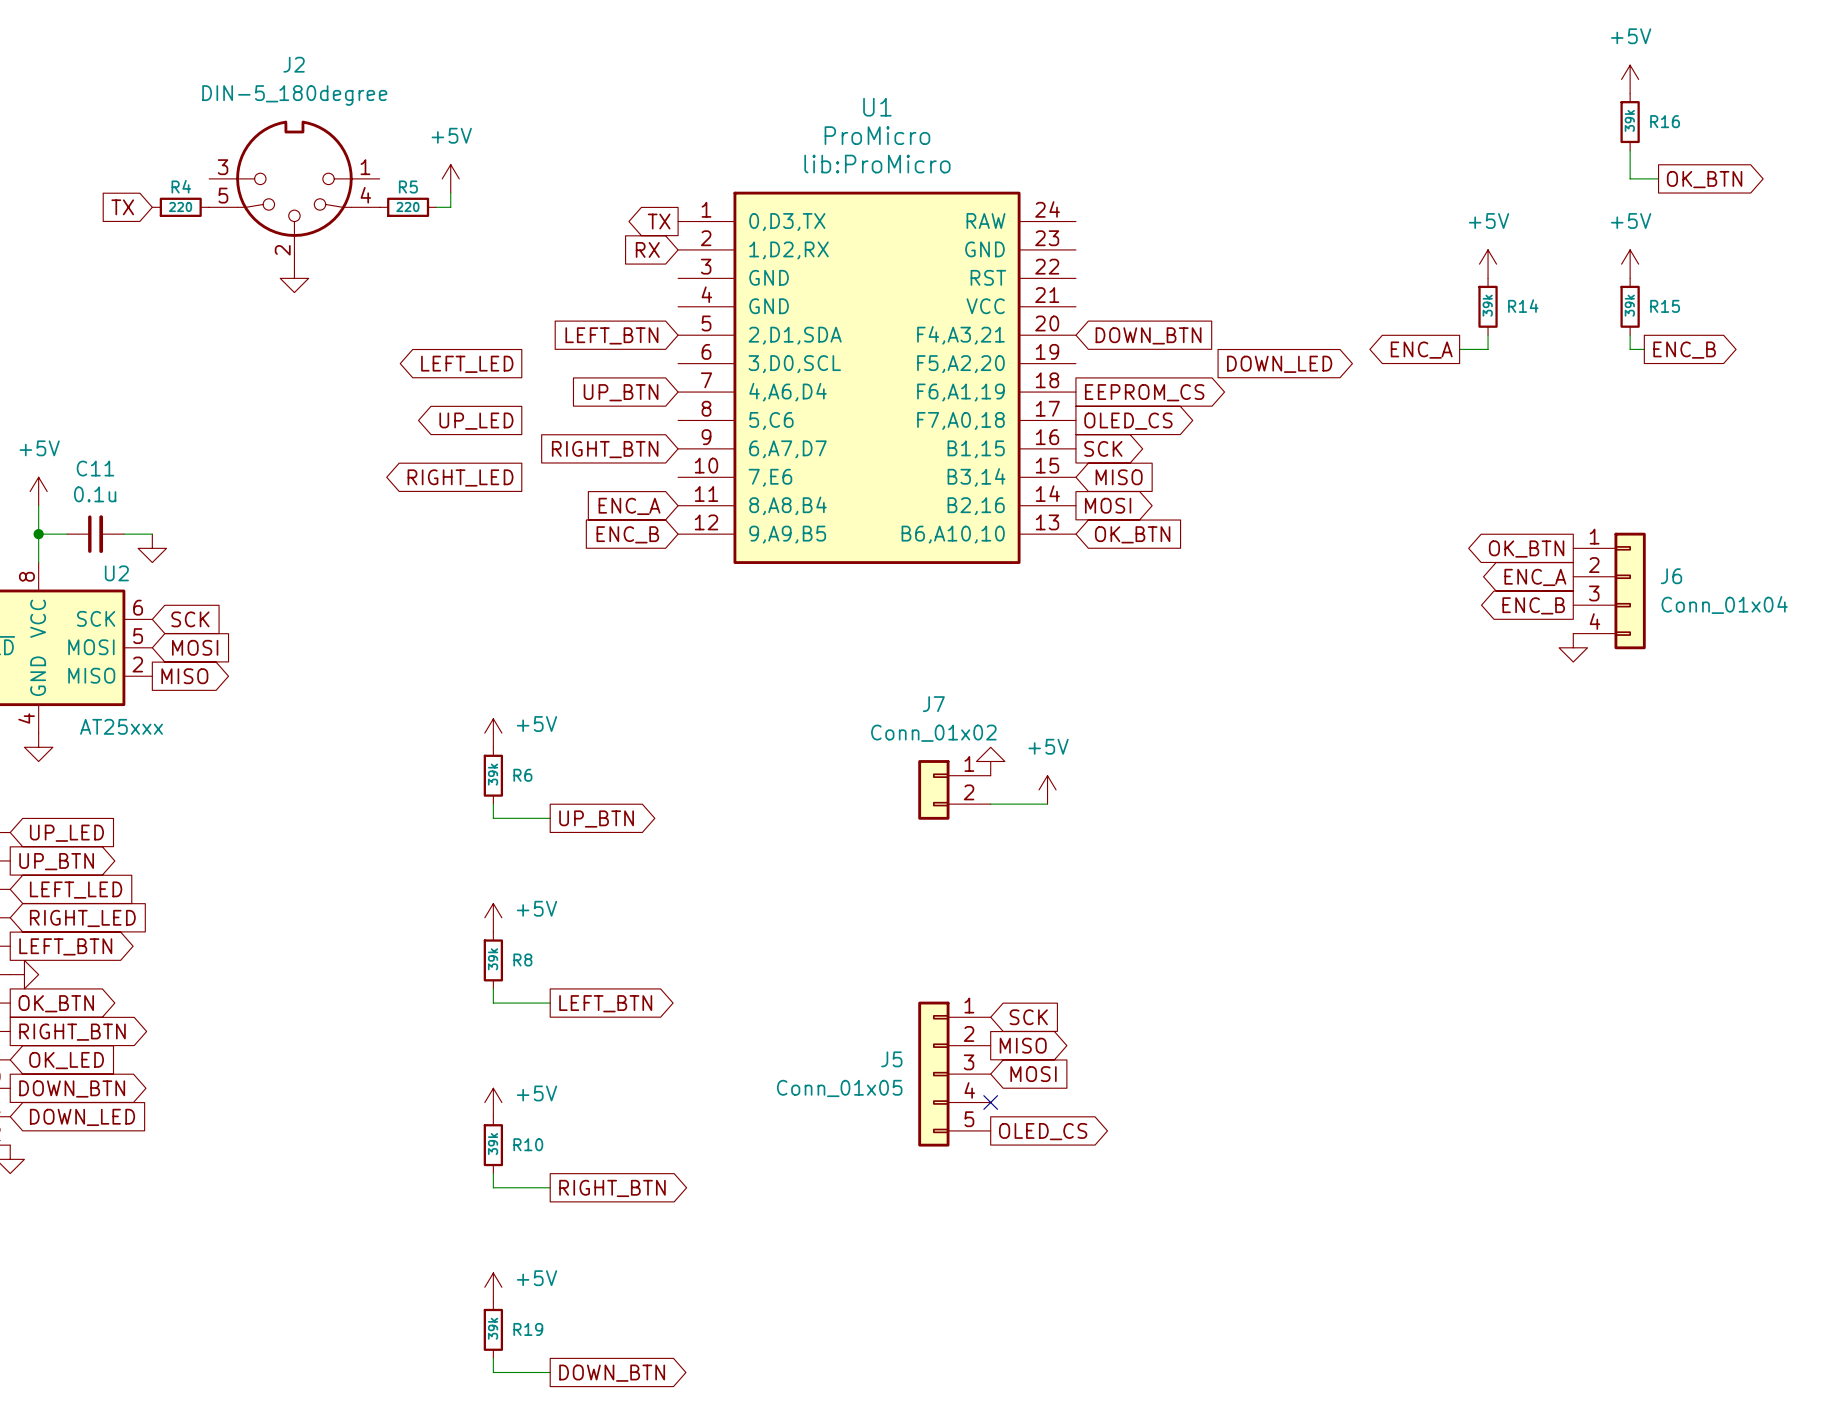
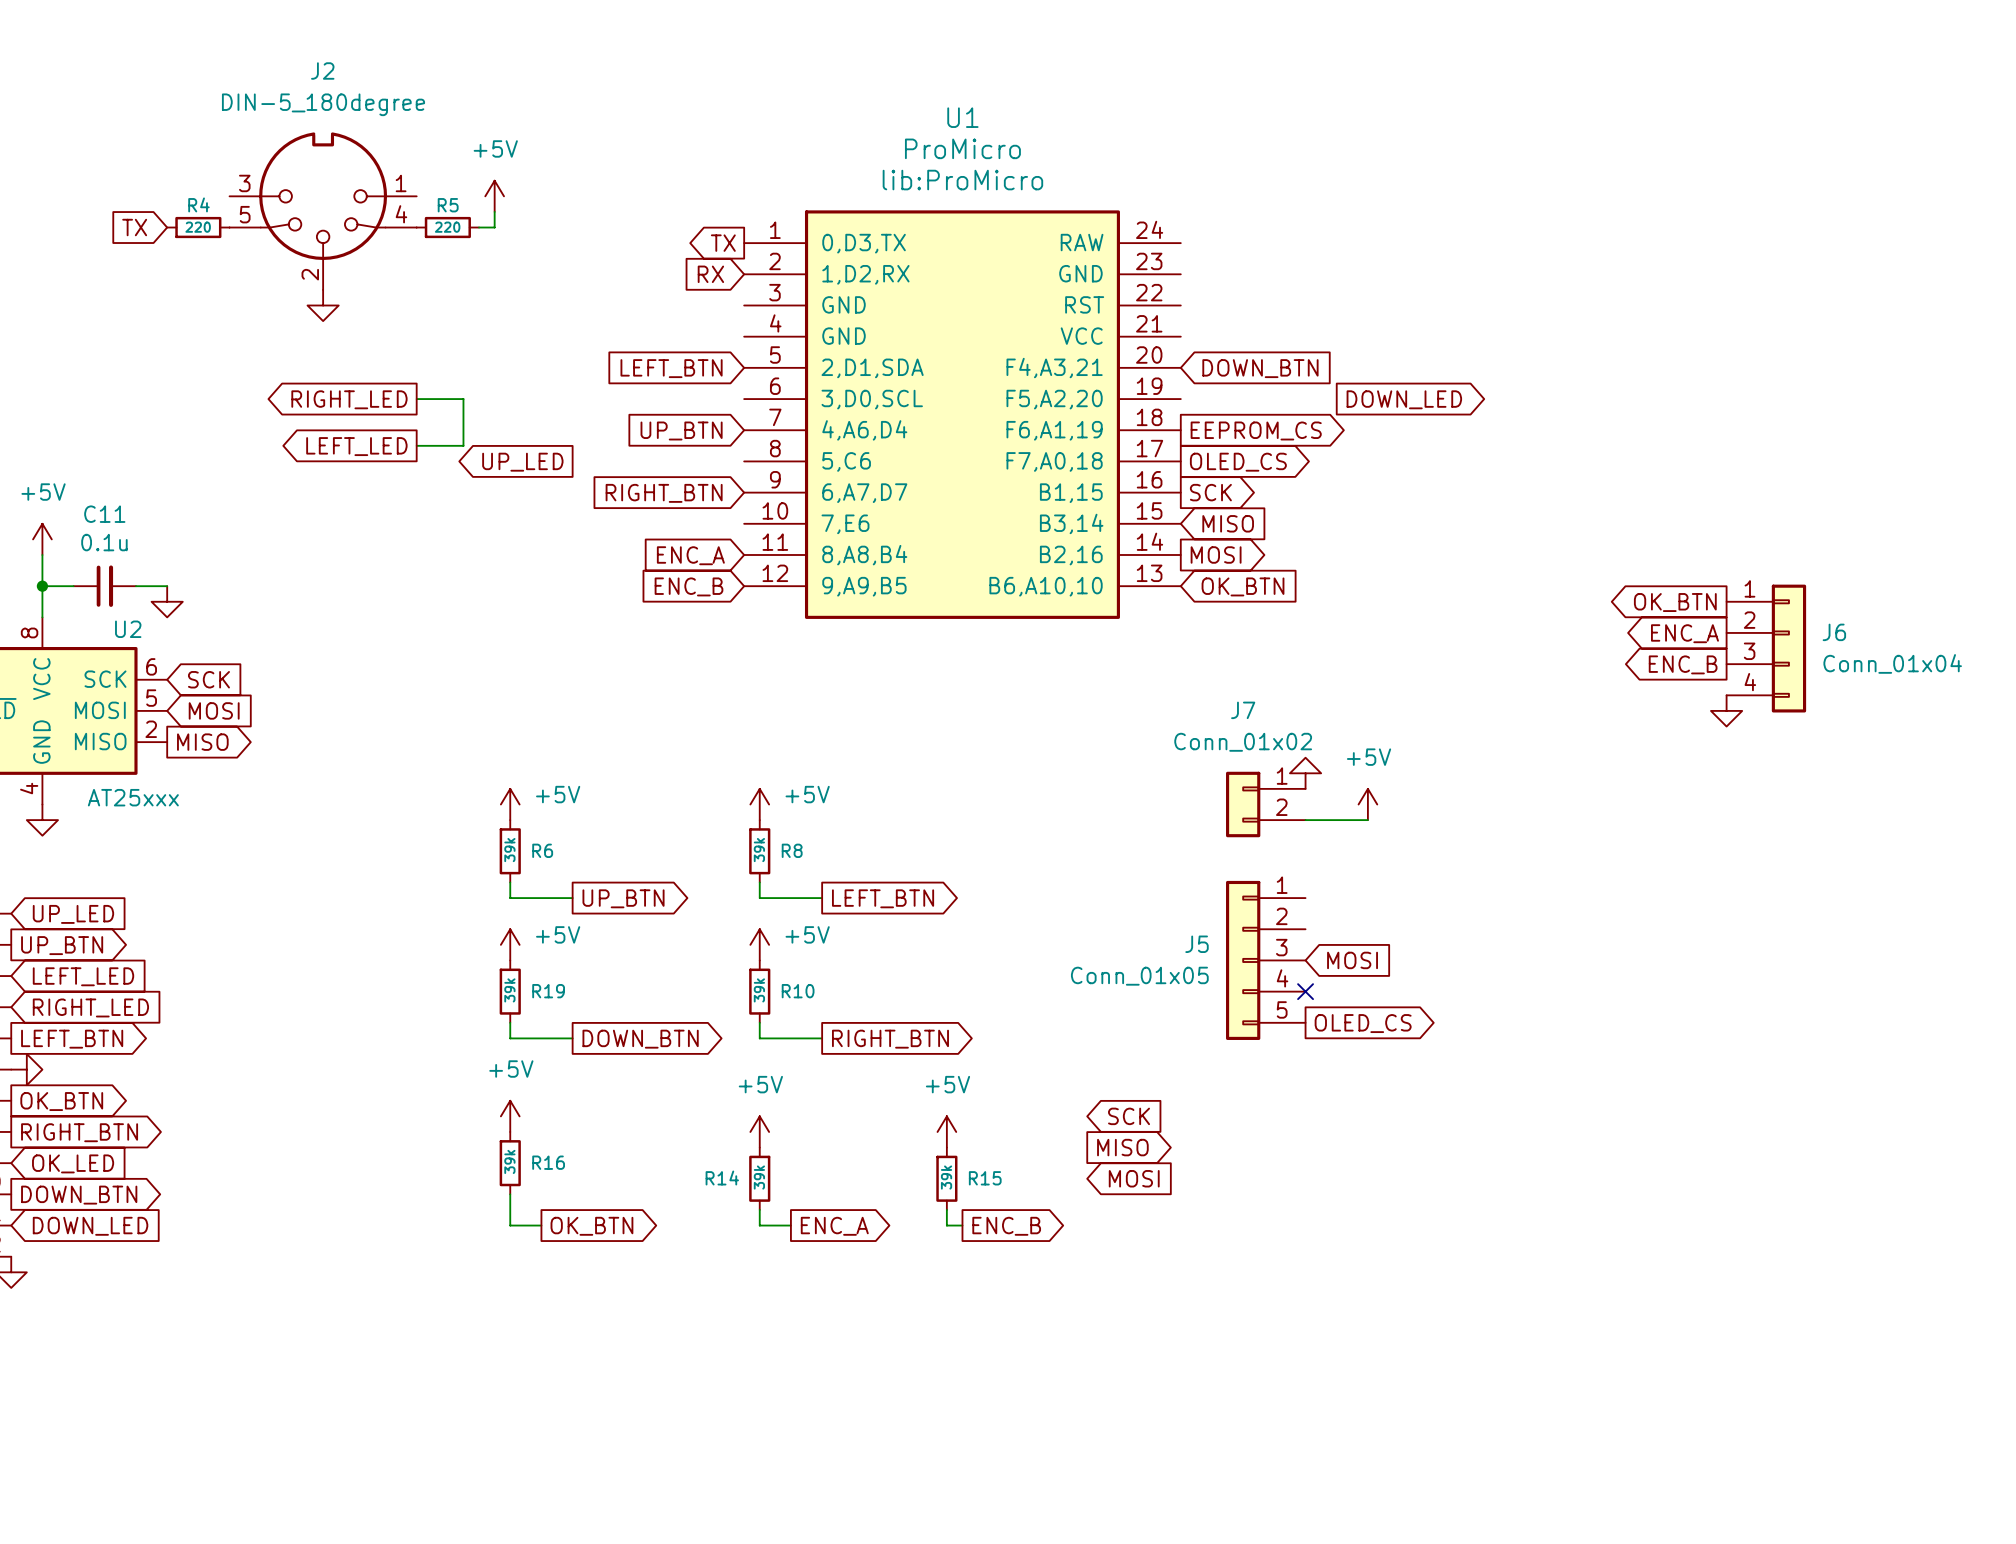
power symbol: +5V (1630, 79) -> none
R16 position: (1630, 122) -> (510, 1163)
wire: (1630, 150) (1630, 178) (1658, 178) -> none
global label: OK_BTN (1704, 179) -> none
power symbol: +5V (1488, 264) -> none
power symbol: +5V (1630, 264) -> none
R14 position: (1488, 306) -> (759, 1178)
R14 name position: R14 (1523, 306) -> R14 (722, 1177)
R15 position: (1630, 306) -> (946, 1178)
wire: (1488, 335) (1488, 349) (1459, 349) -> none
wire: (1630, 335) (1630, 349) (1644, 349) -> none
global label: ENC_A (1421, 350) -> none
global label: ENC_B (1684, 350) -> none
wire: none -> (416, 399) (463, 399) (463, 445) (416, 445)
global label position: LEFT_LED (467, 364) -> LEFT_LED (356, 446)
global label position: RIGHT_LED (460, 477) -> RIGHT_LED (349, 399)
power symbol position: +5V (493, 733) -> +5V (510, 804)
power symbol: none -> +5V (759, 804)
power symbol: none -> +5V (1367, 804)
power symbol position: (990, 761) -> (1305, 773)
R6 position: (493, 775) -> (510, 851)
J7 position: (954, 789) -> (1265, 804)
power symbol: +5V (1047, 789) -> none
wire: (493, 804) (493, 818) -> (510, 882) (510, 898) (541, 898)
wire: none -> (759, 882) (759, 898) (822, 898)
wire: (990, 804) (1047, 804) -> (1305, 820) (1367, 820)
wire: (521, 818) (550, 818) -> none
global label position: UP_BTN (596, 819) -> UP_BTN (623, 898)
power symbol: none -> +5V (510, 944)
power symbol: none -> +5V (759, 944)
global label: none -> MOSI (1352, 960)
no-connect mark: none -> (1305, 991)
power symbol: +5V (493, 917) -> none
global label: none -> OLED_CS (1363, 1023)
global label: none -> DOWN_BTN (640, 1039)
global label: none -> RIGHT_BTN (890, 1039)
R8 position: (493, 960) -> (759, 851)
wire: (493, 988) (493, 1003) (550, 1003) -> (759, 1022) (759, 1038) (822, 1038)
global label position: LEFT_BTN (605, 1003) -> LEFT_BTN (883, 898)
power symbol: none -> +5V (510, 1116)
power symbol: none -> +5V (759, 1131)
power symbol: none -> +5V (946, 1131)
J5 position: (954, 1074) -> (1265, 960)
wire: none -> (510, 1194) (510, 1225) (541, 1225)
power symbol: +5V (493, 1102) -> none
wire: none -> (759, 1209) (759, 1225) (790, 1225)
wire: none -> (946, 1209) (946, 1225) (962, 1225)
no-connect mark: (990, 1102) -> none
global label: none -> OK_BTN (591, 1226)
global label: none -> ENC_A (834, 1226)
global label: none -> ENC_B (1006, 1226)
global label: OLED_CS (1043, 1131) -> none
R10 position: (493, 1145) -> (759, 991)
wire: (493, 1173) (493, 1187) (550, 1187) -> (510, 1022) (510, 1038) (572, 1038)
global label: RIGHT_BTN (612, 1188) -> none
power symbol: +5V (493, 1287) -> none
R19 position: (493, 1329) -> (510, 991)
wire: (493, 1358) (493, 1372) (550, 1372) -> none
global label: DOWN_BTN (612, 1373) -> none

